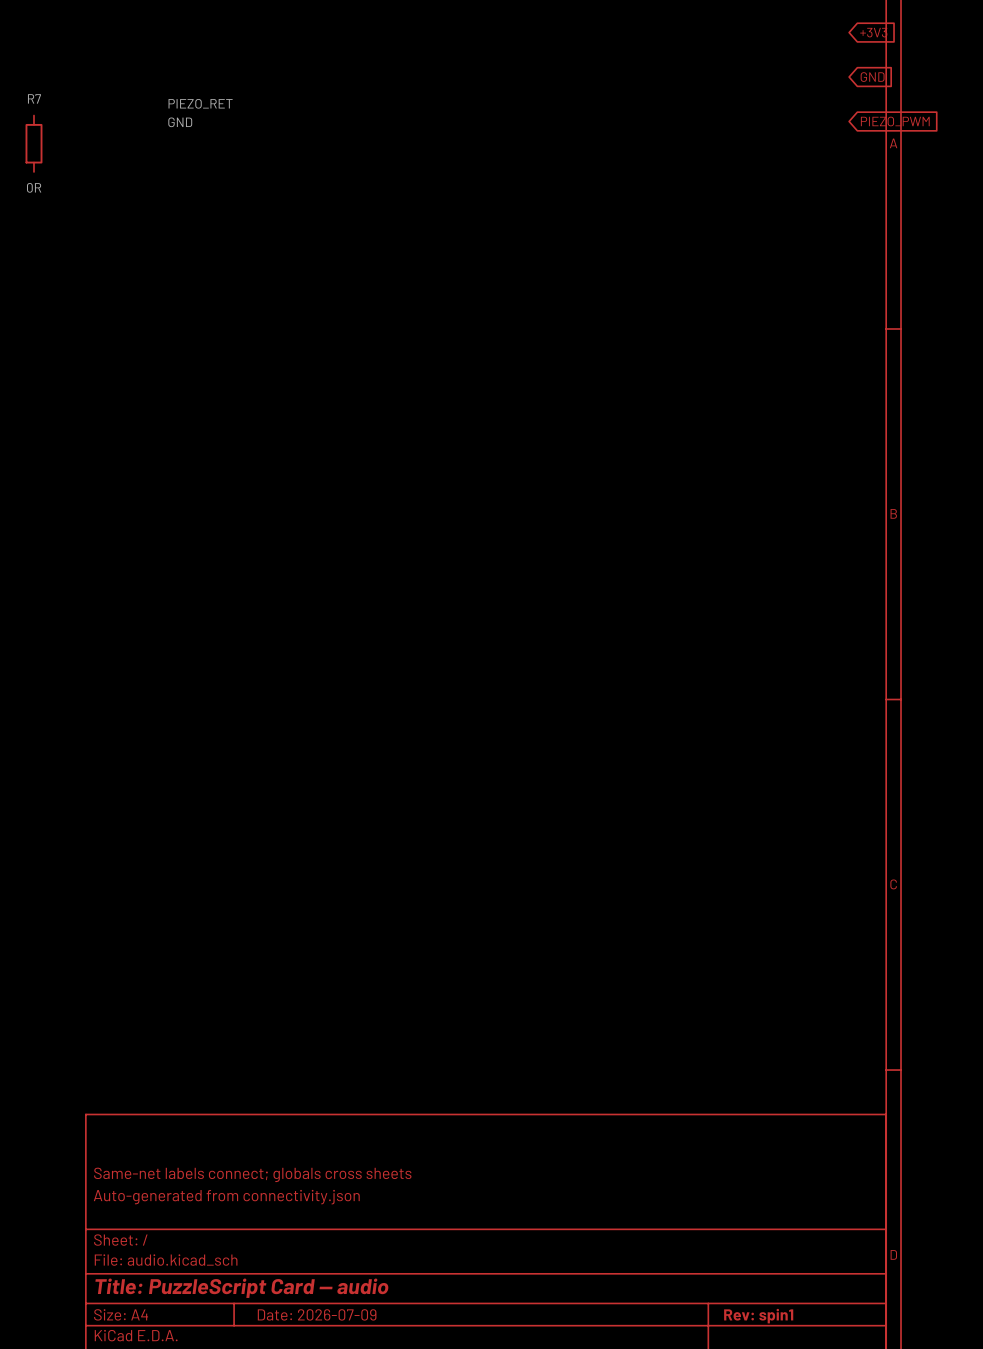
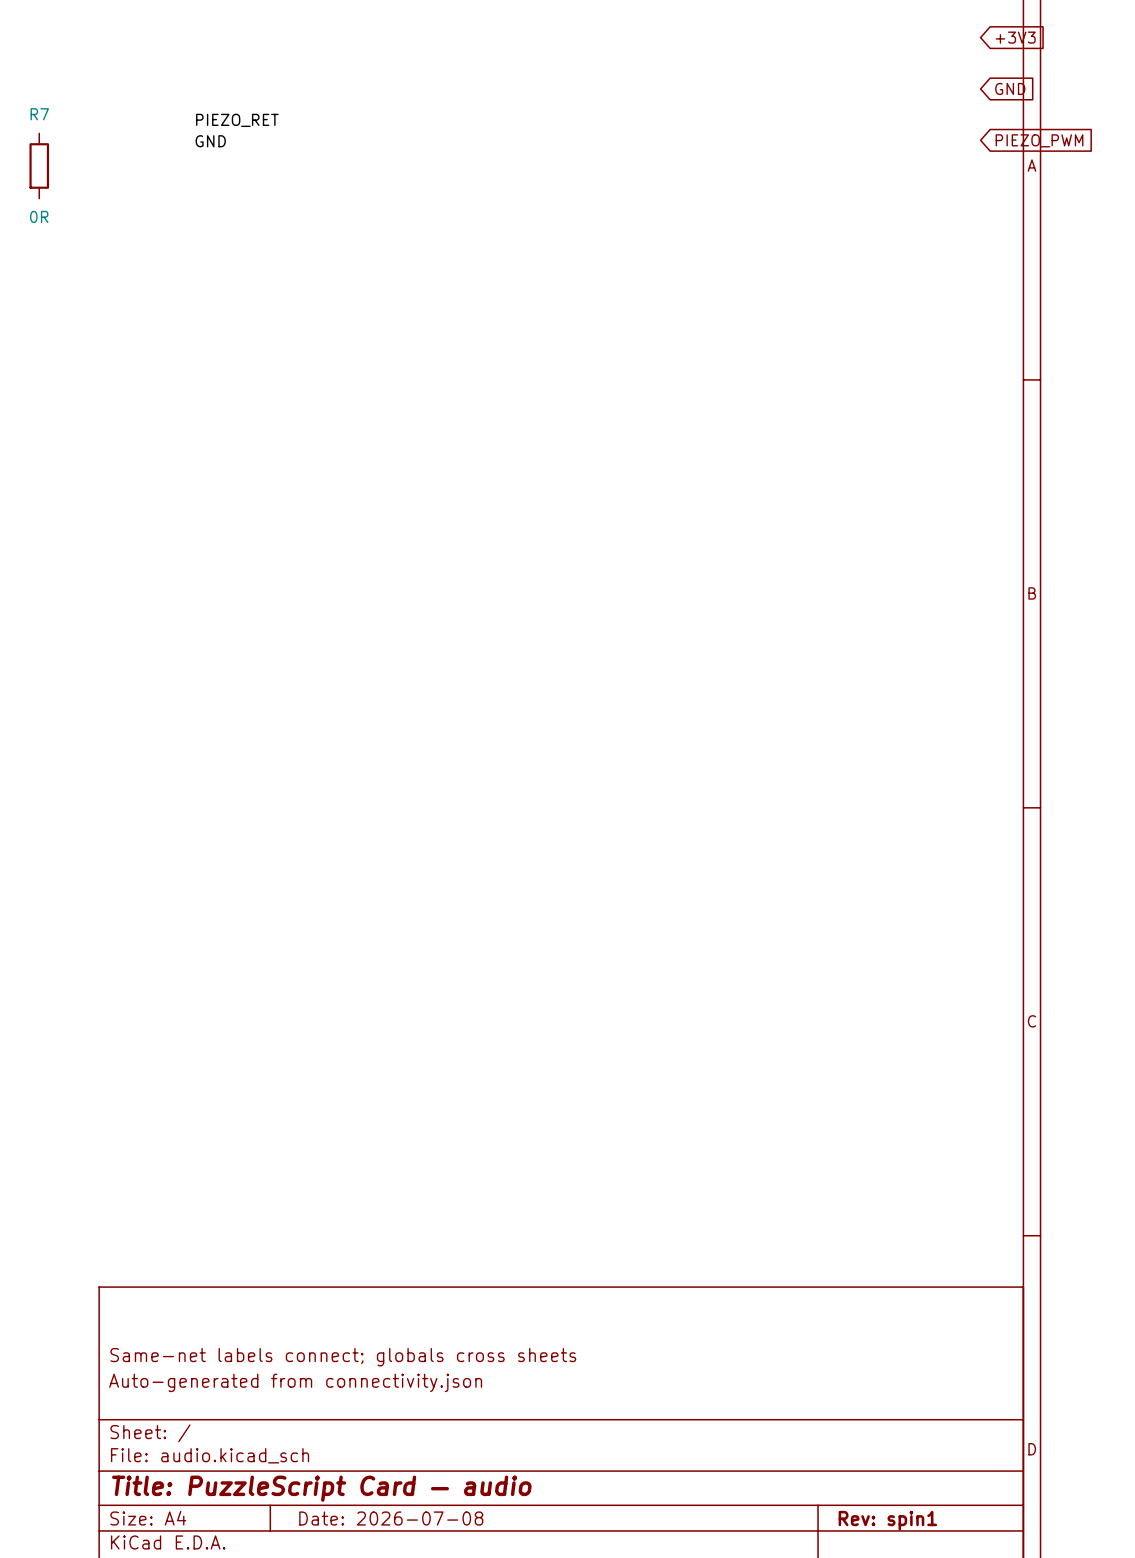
title block: Date: 2026-07-09 (317, 1314) -> Date: 2026-07-08 (391, 1518)

